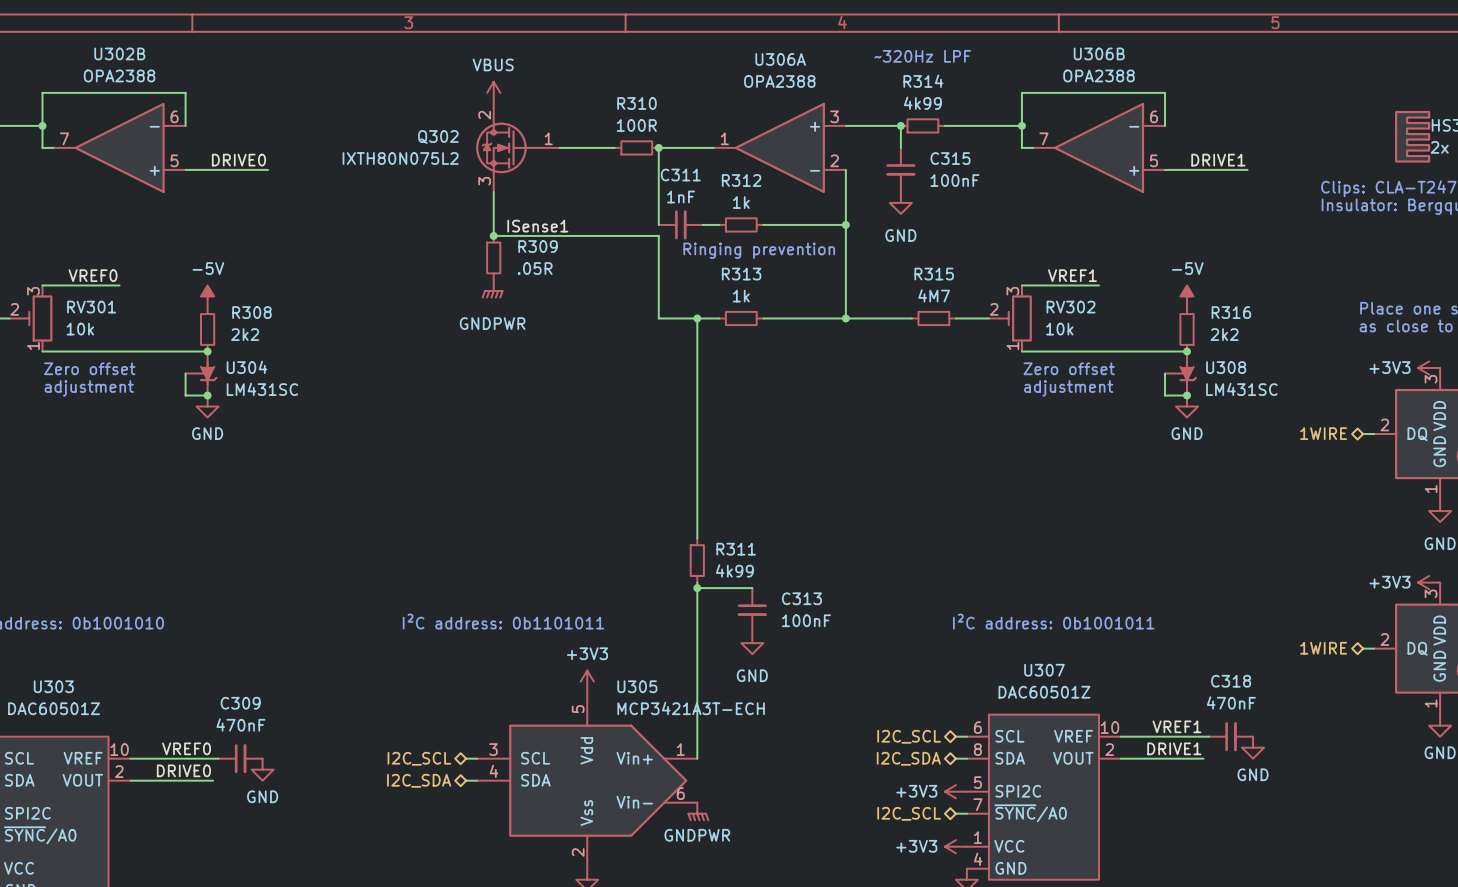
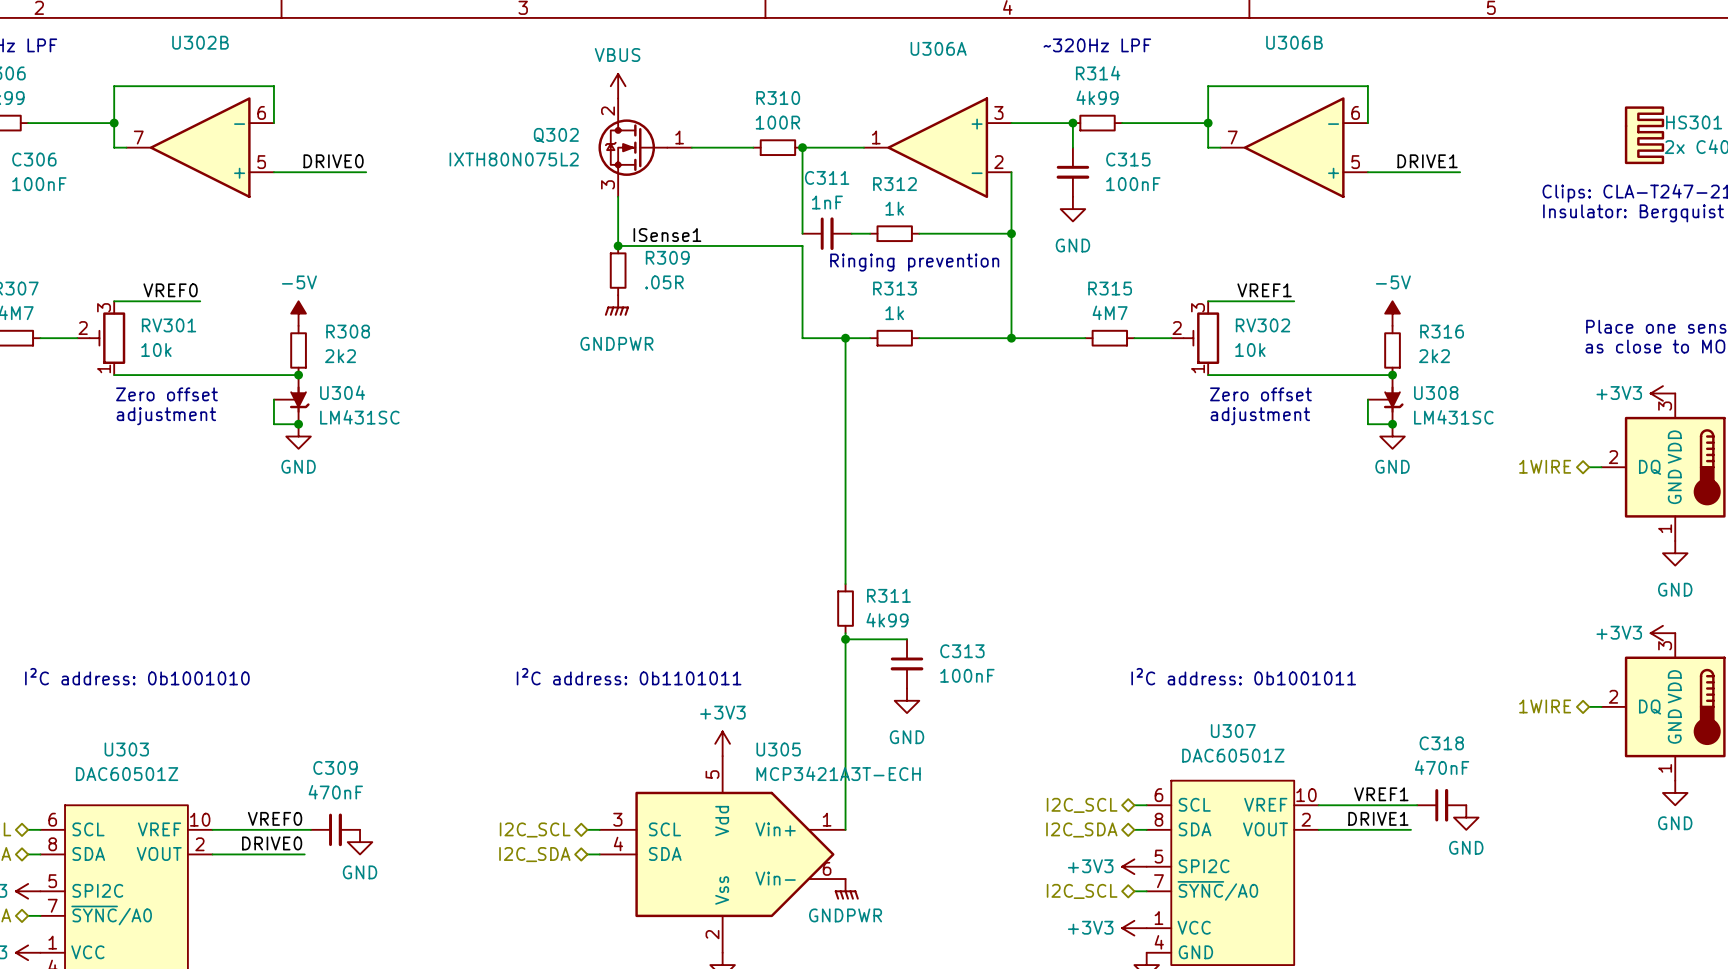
U302B value: OPA2388 (119, 75) -> none
U306B value: OPA2388 (1098, 75) -> none
U306A value: OPA2388 (779, 81) -> none

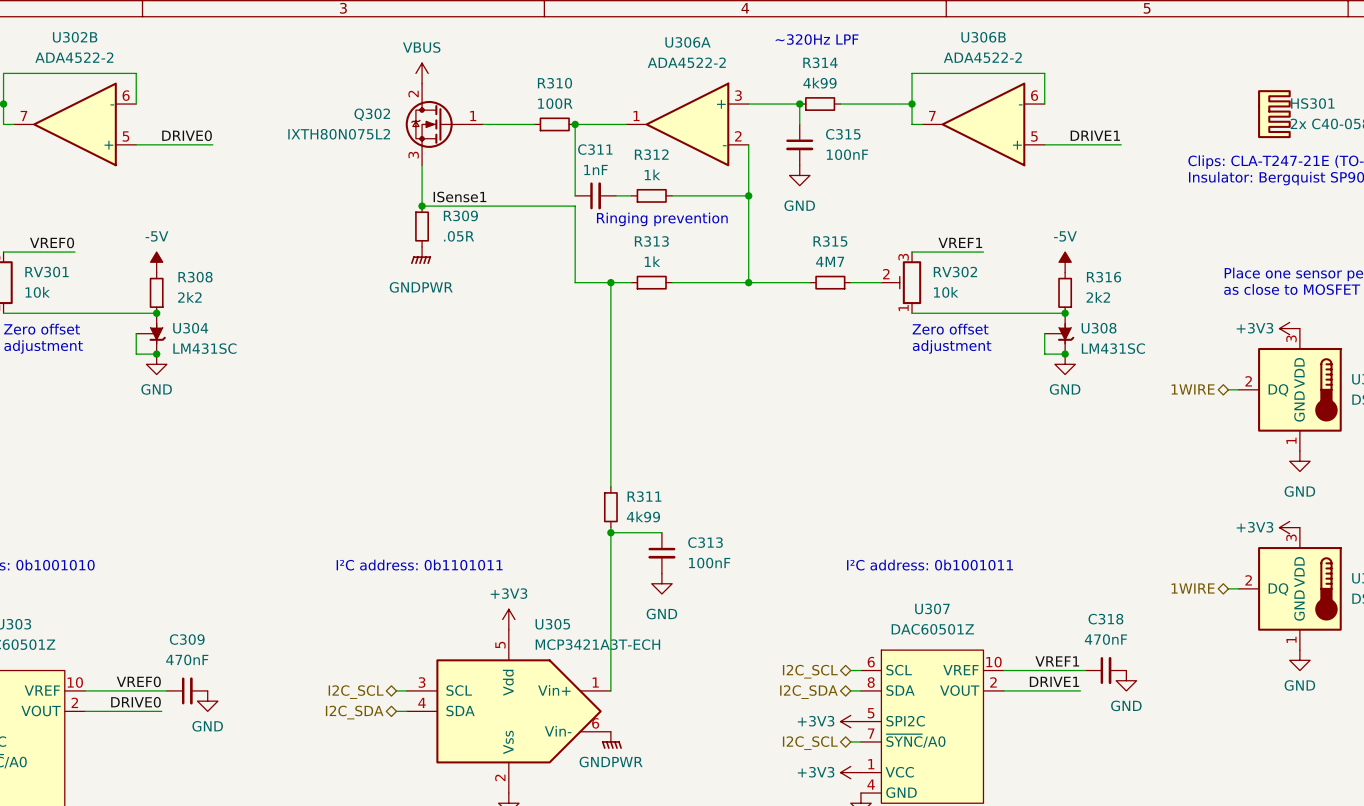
U302B value: none -> ADA4522-2 (74, 57)
U306B value: none -> ADA4522-2 (982, 57)
U306A value: none -> ADA4522-2 (686, 62)

